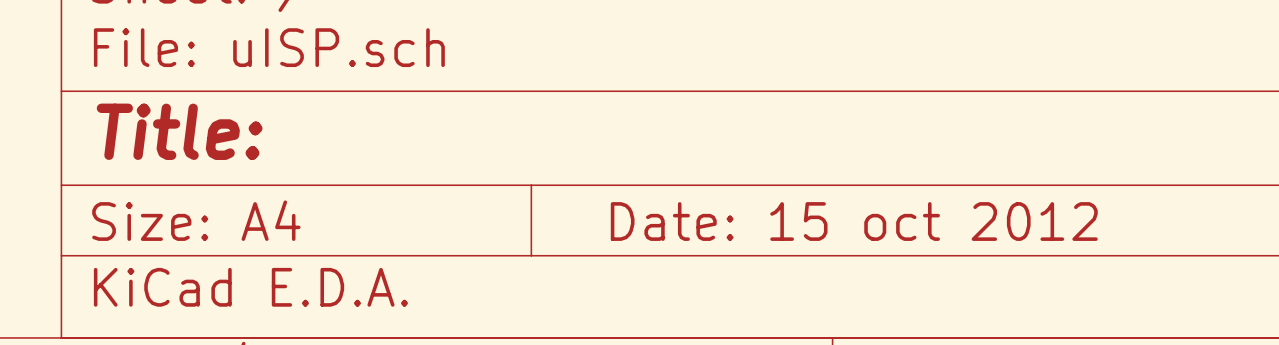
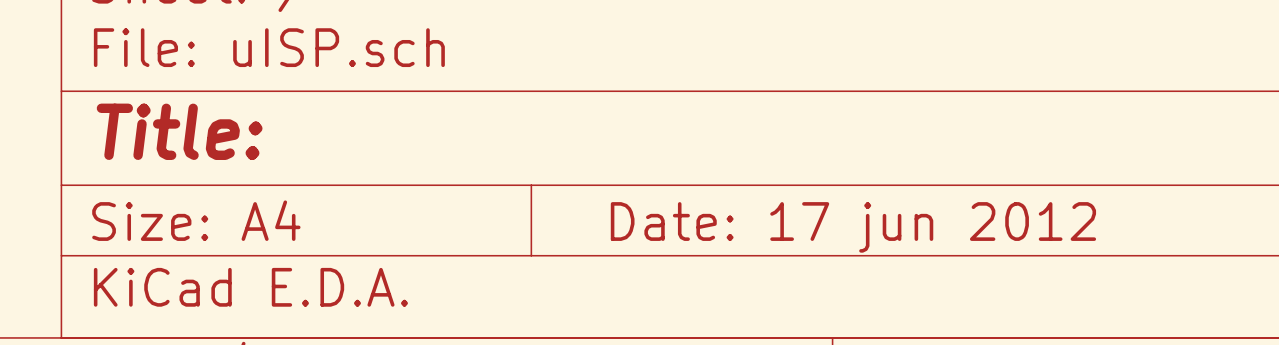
title block: Date: 15 oct 2012 (854, 221) -> Date: 17 jun 2012 (853, 227)

